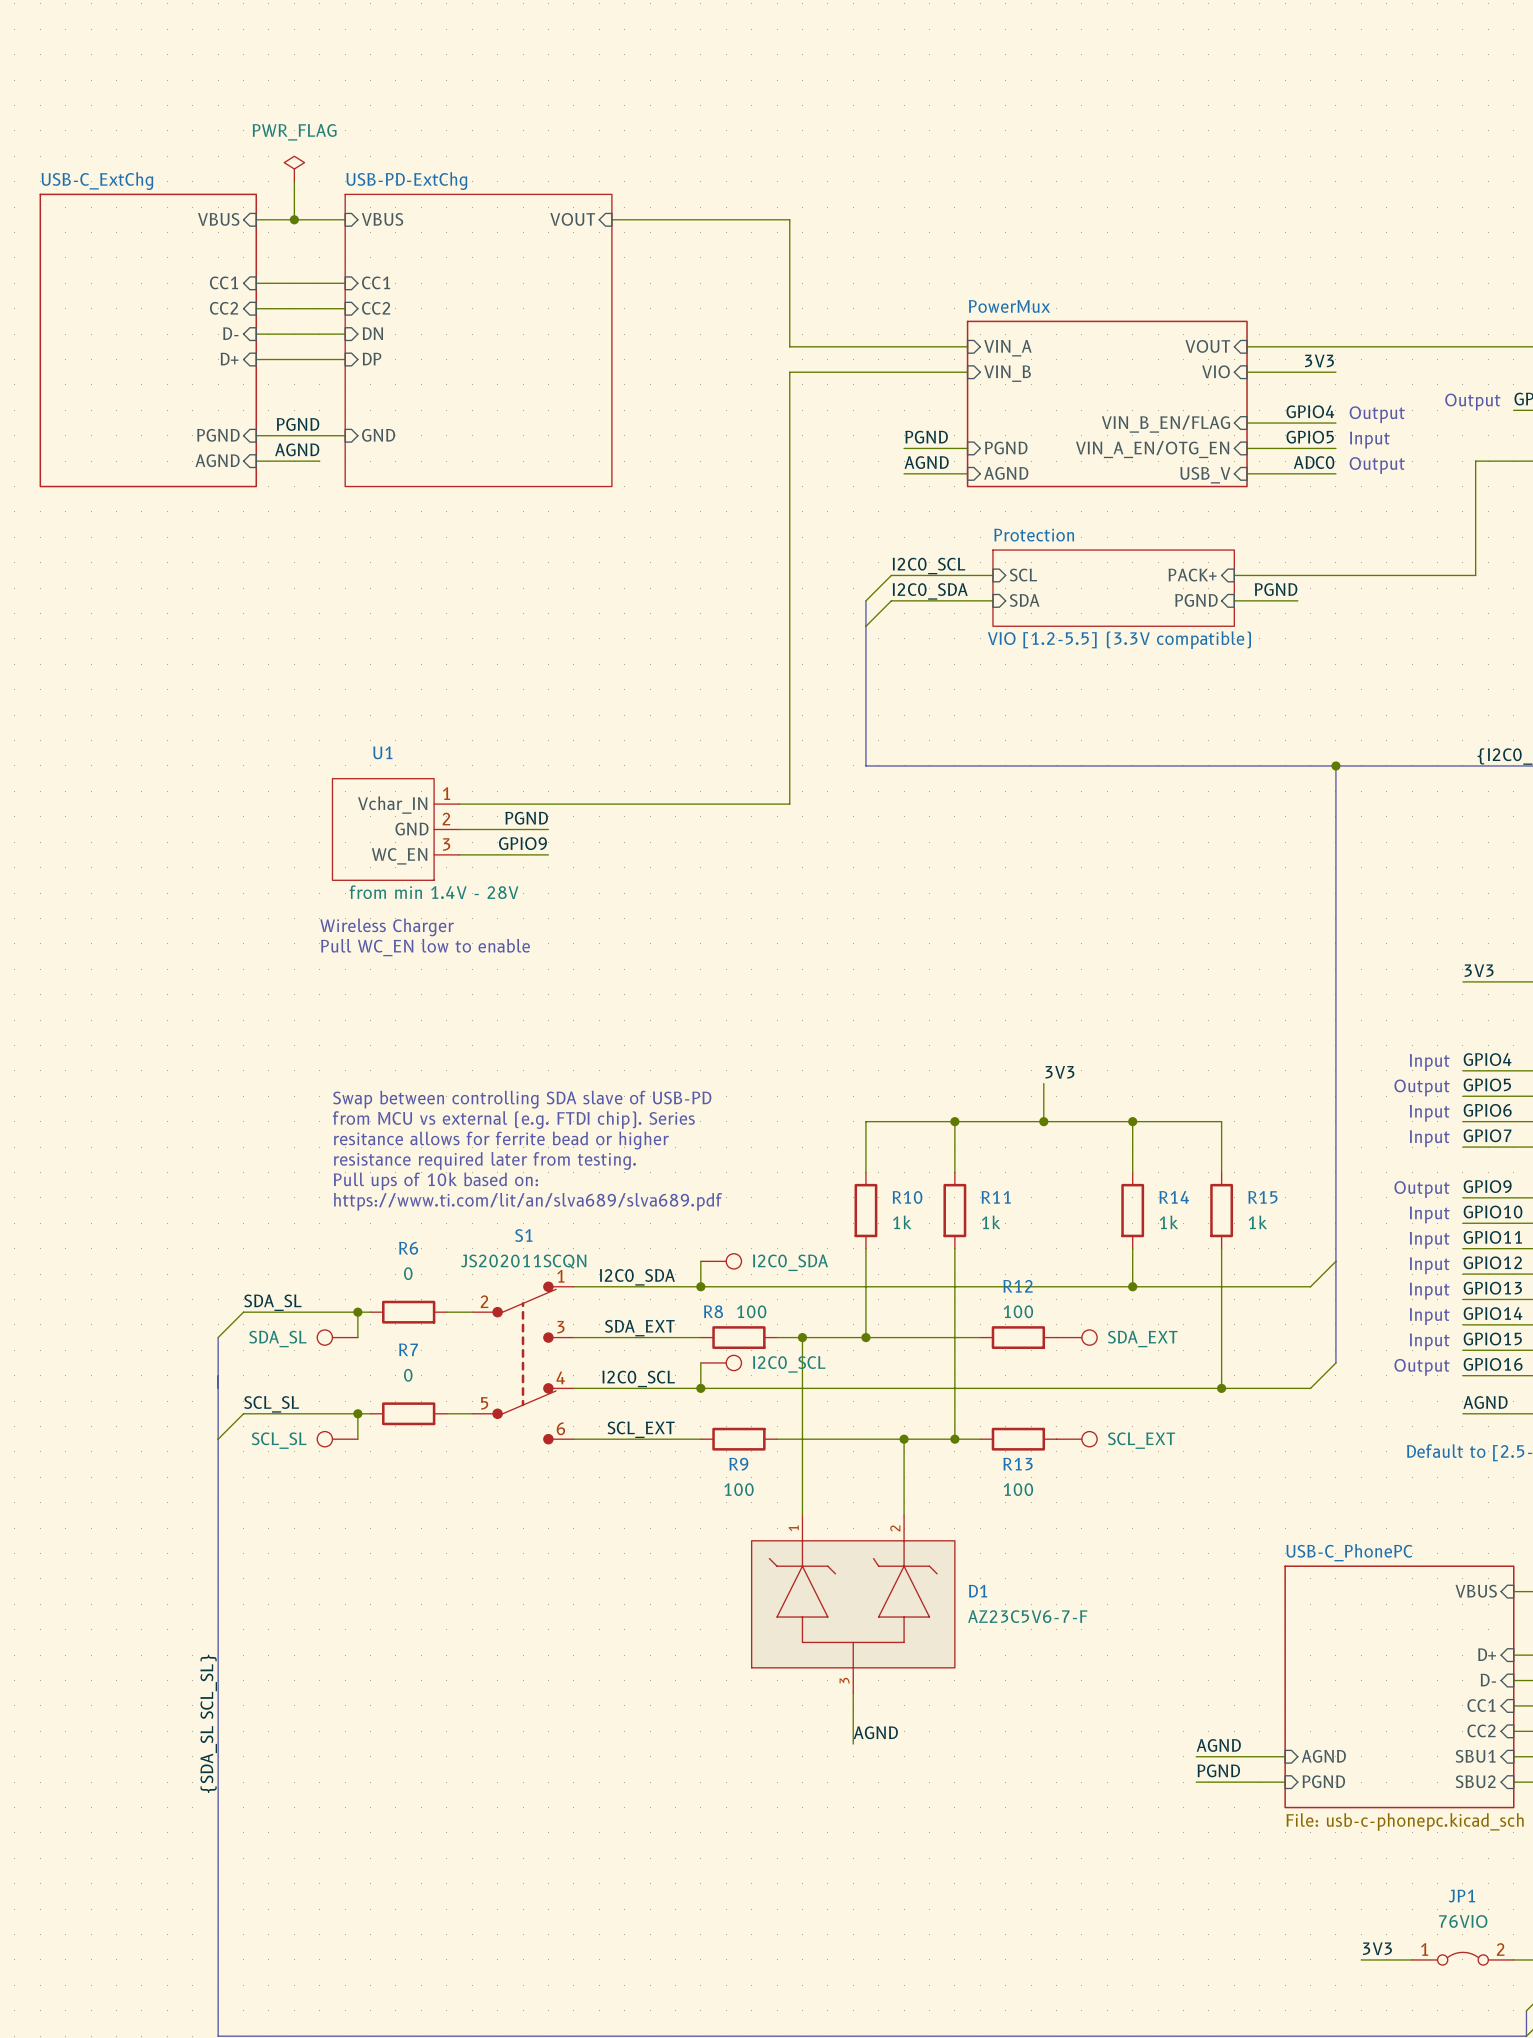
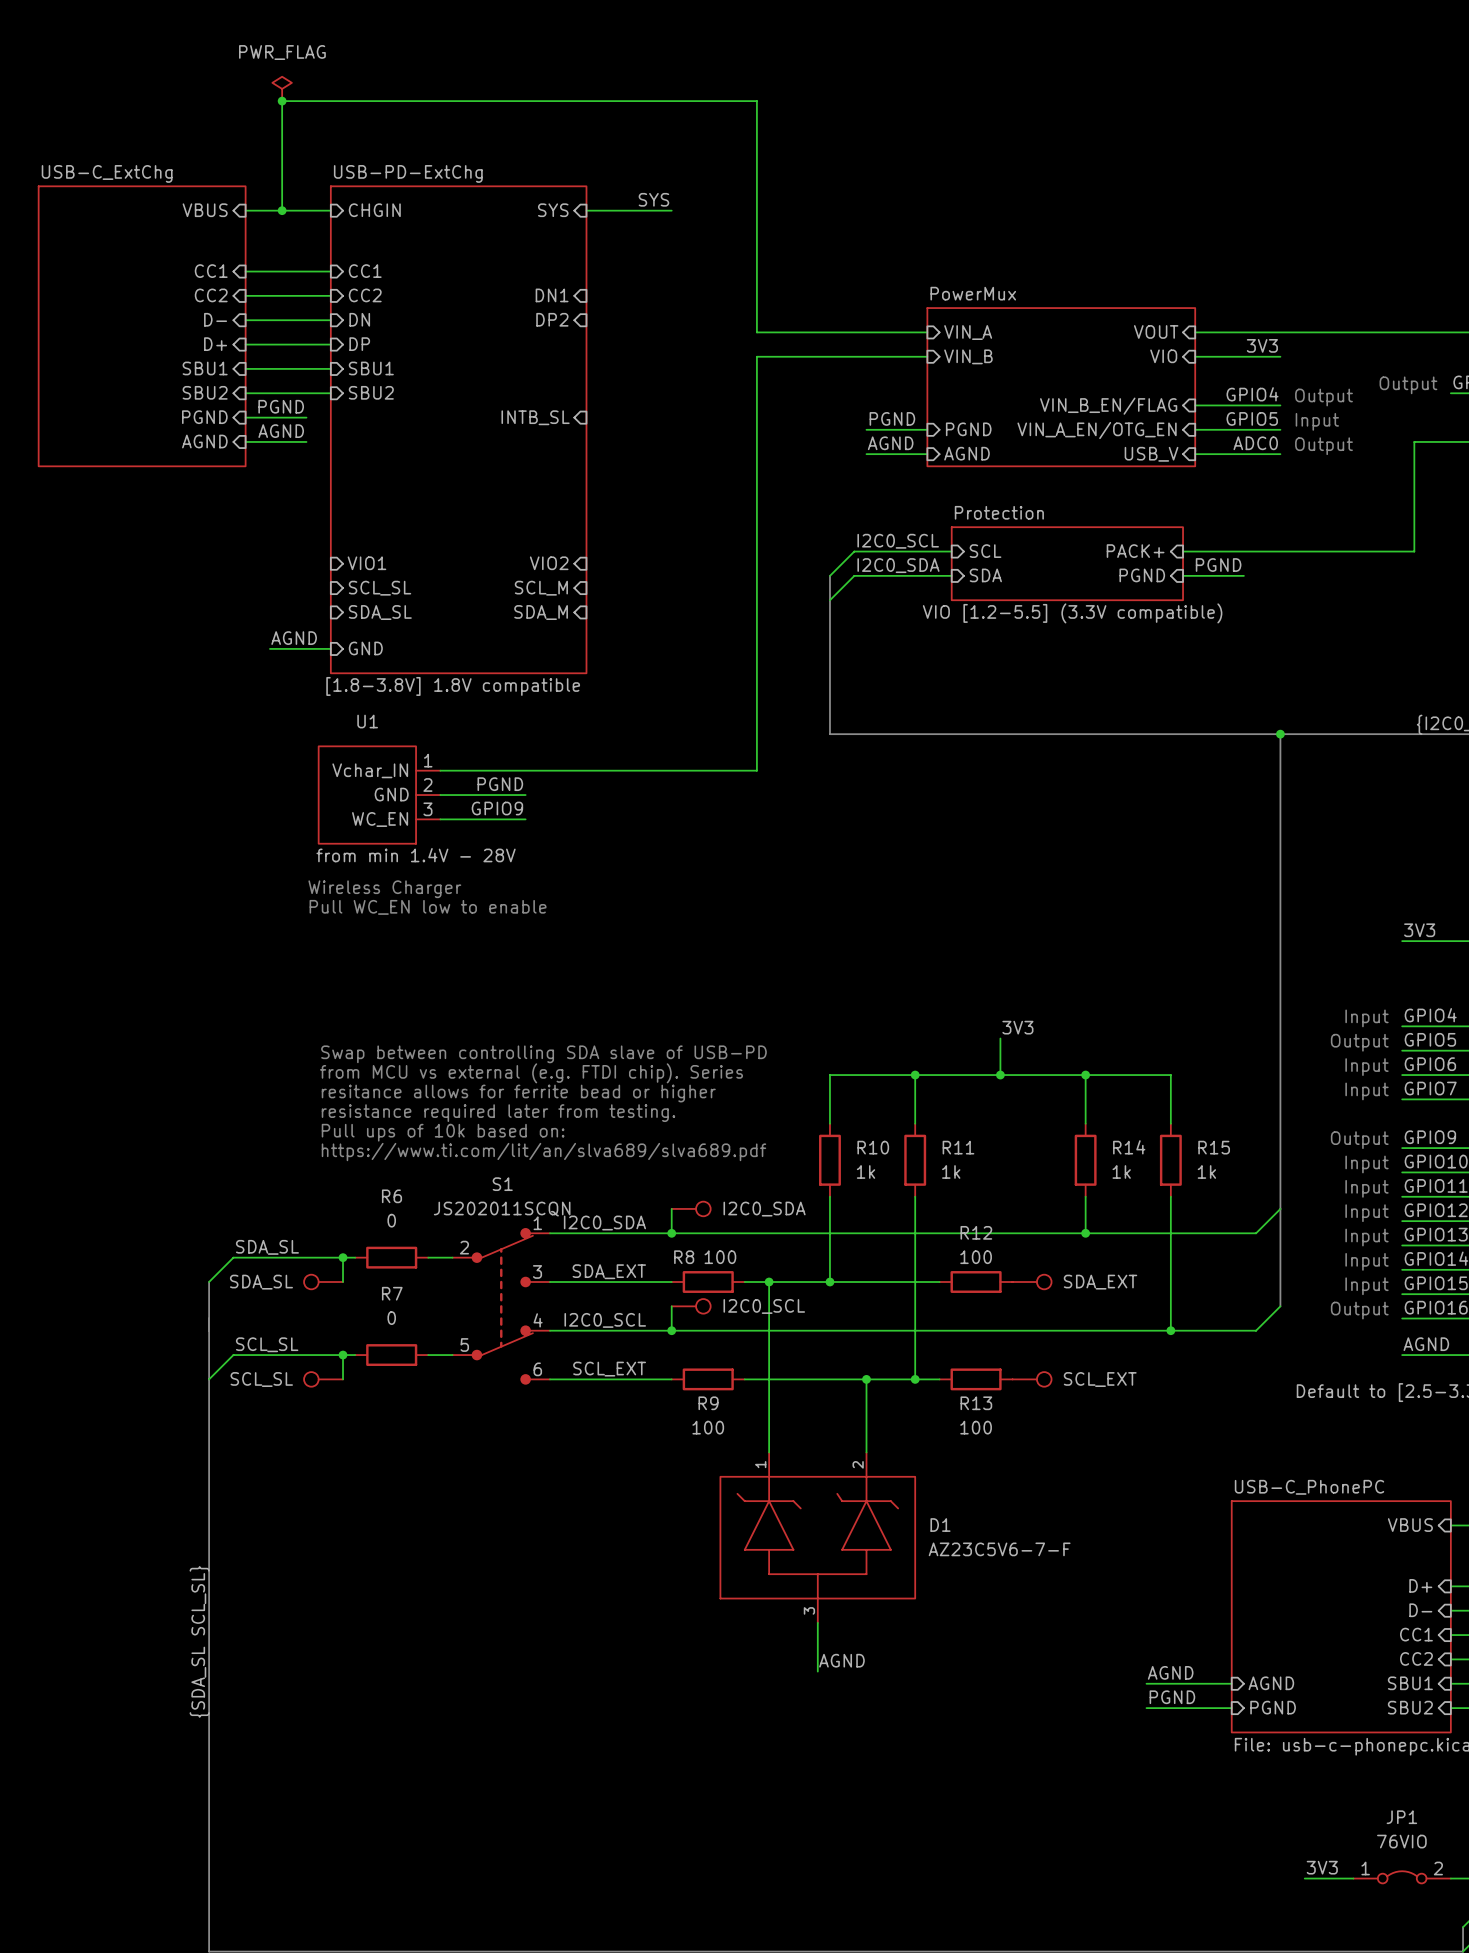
junction: none -> (282, 101)
power symbol position: PWR_FLAG (294, 168) -> PWR_FLAG (282, 88)
label: none -> SYS (653, 199)
sheet pin: VBUS (382, 219) -> CHGIN (374, 210)
sheet pin: VOUT (572, 219) -> SYS (553, 210)
wire: (700, 219) (789, 219) -> (282, 174) (282, 101) (756, 101) (756, 210)
sheet pin: none -> DN1 (552, 295)
sheet pin: none -> DP2 (552, 319)
sheet USB-PD-ExtChg: (478, 340) -> none
sheet pin: none -> SBU1 (205, 368)
wire: none -> (245, 368) (330, 368)
sheet pin: none -> SBU1 (371, 368)
sheet pin: none -> SBU2 (205, 392)
sheet pin: none -> SBU2 (371, 392)
wire: none -> (245, 393) (330, 393)
wire: (319, 435) (345, 435) -> none
sheet pin position: GND (378, 435) -> GND (365, 648)
sheet pin: none -> INTB_SL (535, 417)
sheet USB-PD-ExtChg: none -> (458, 429)
sheet pin: none -> VIO1 (366, 563)
sheet pin: none -> VIO2 (549, 563)
sheet pin: none -> SCL_SL (380, 588)
sheet pin: none -> SCL_M (541, 588)
sheet pin: none -> SDA_SL (380, 612)
sheet pin: none -> SDA_M (541, 612)
label: none -> AGND (294, 638)
wire: none -> (269, 648) (330, 648)

